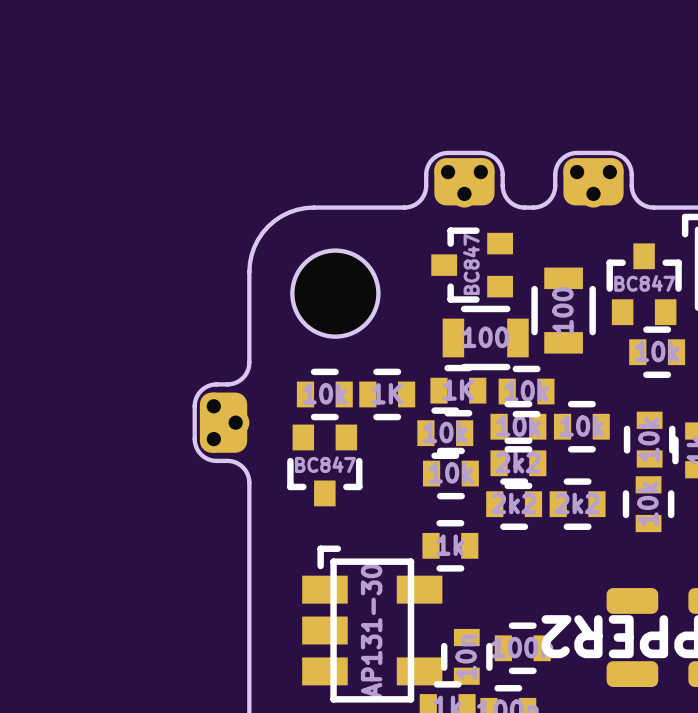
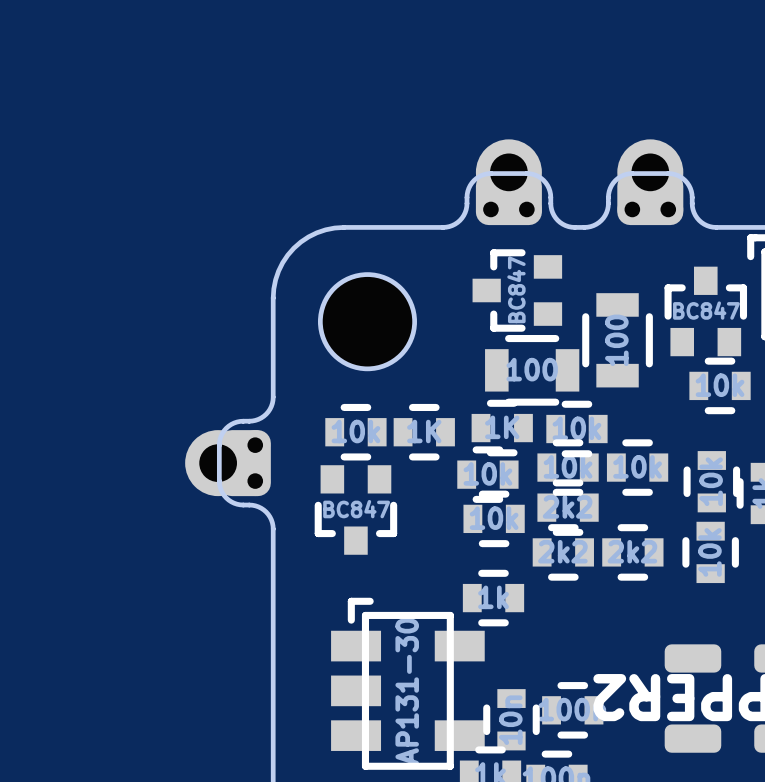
part footprint: [402, 150, 527, 210] -> [440, 139, 578, 230]
part footprint: [531, 150, 656, 210] -> [582, 139, 719, 230]
part footprint: [192, 360, 252, 485] -> [185, 394, 276, 532]

